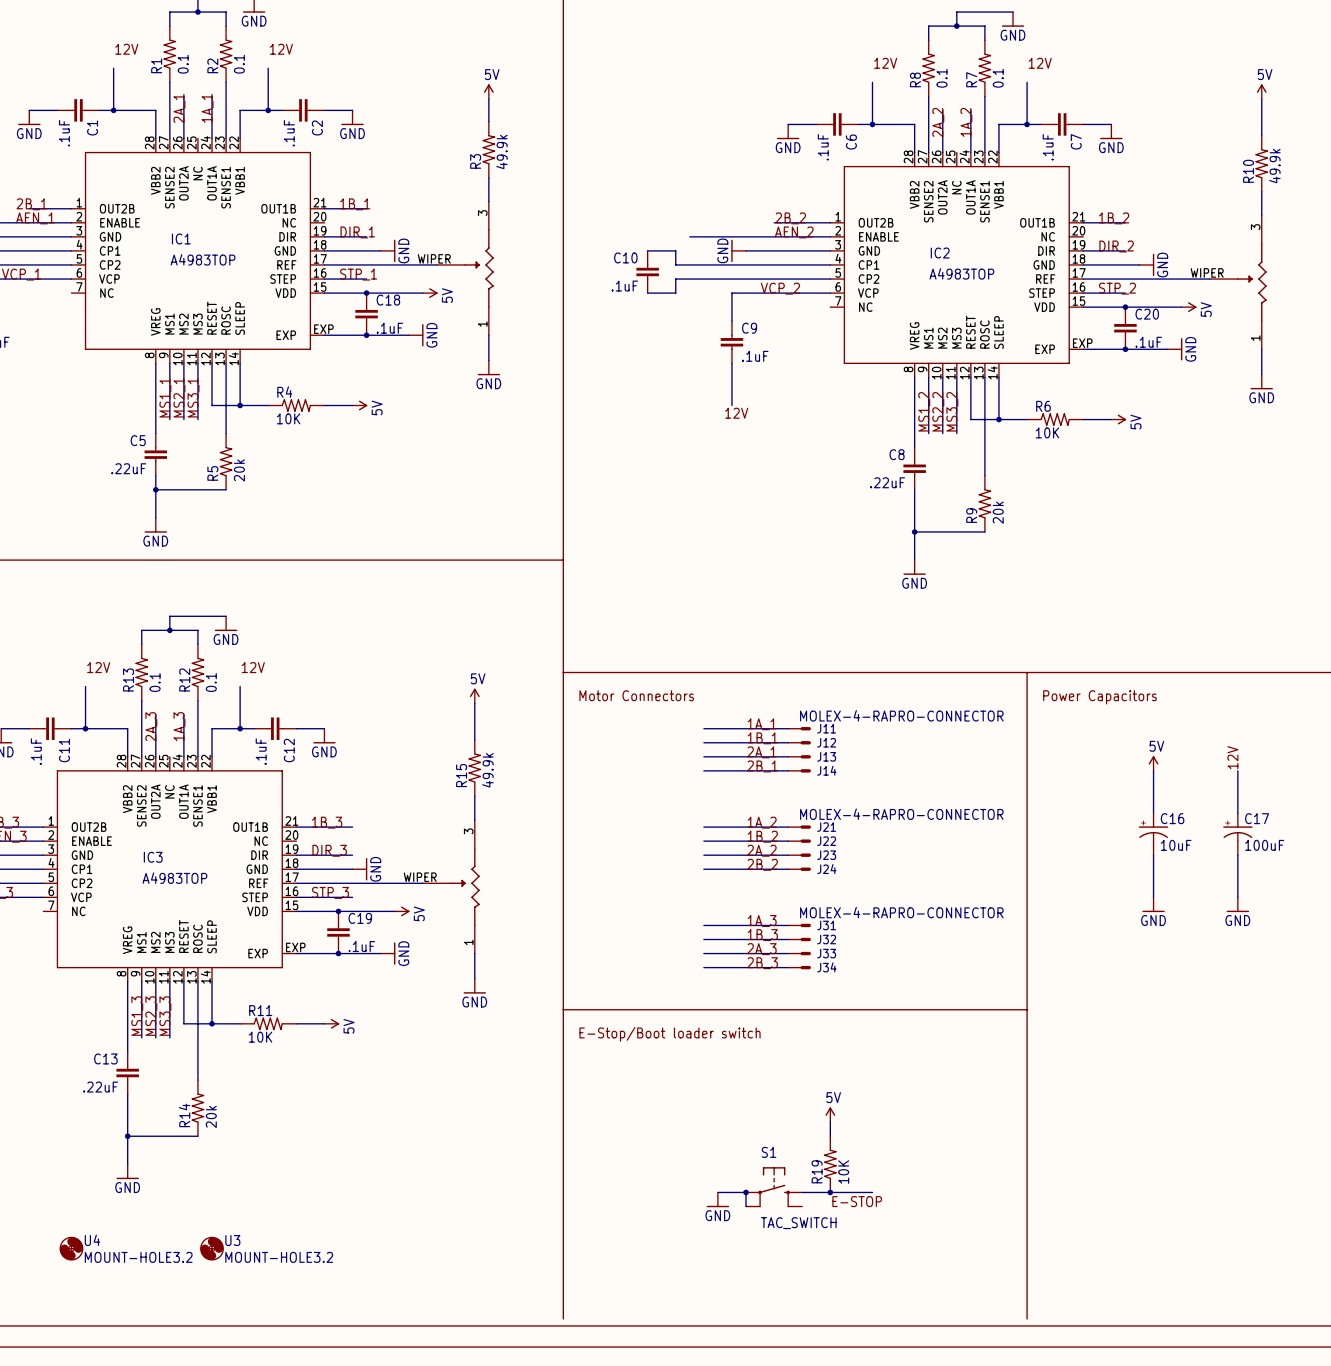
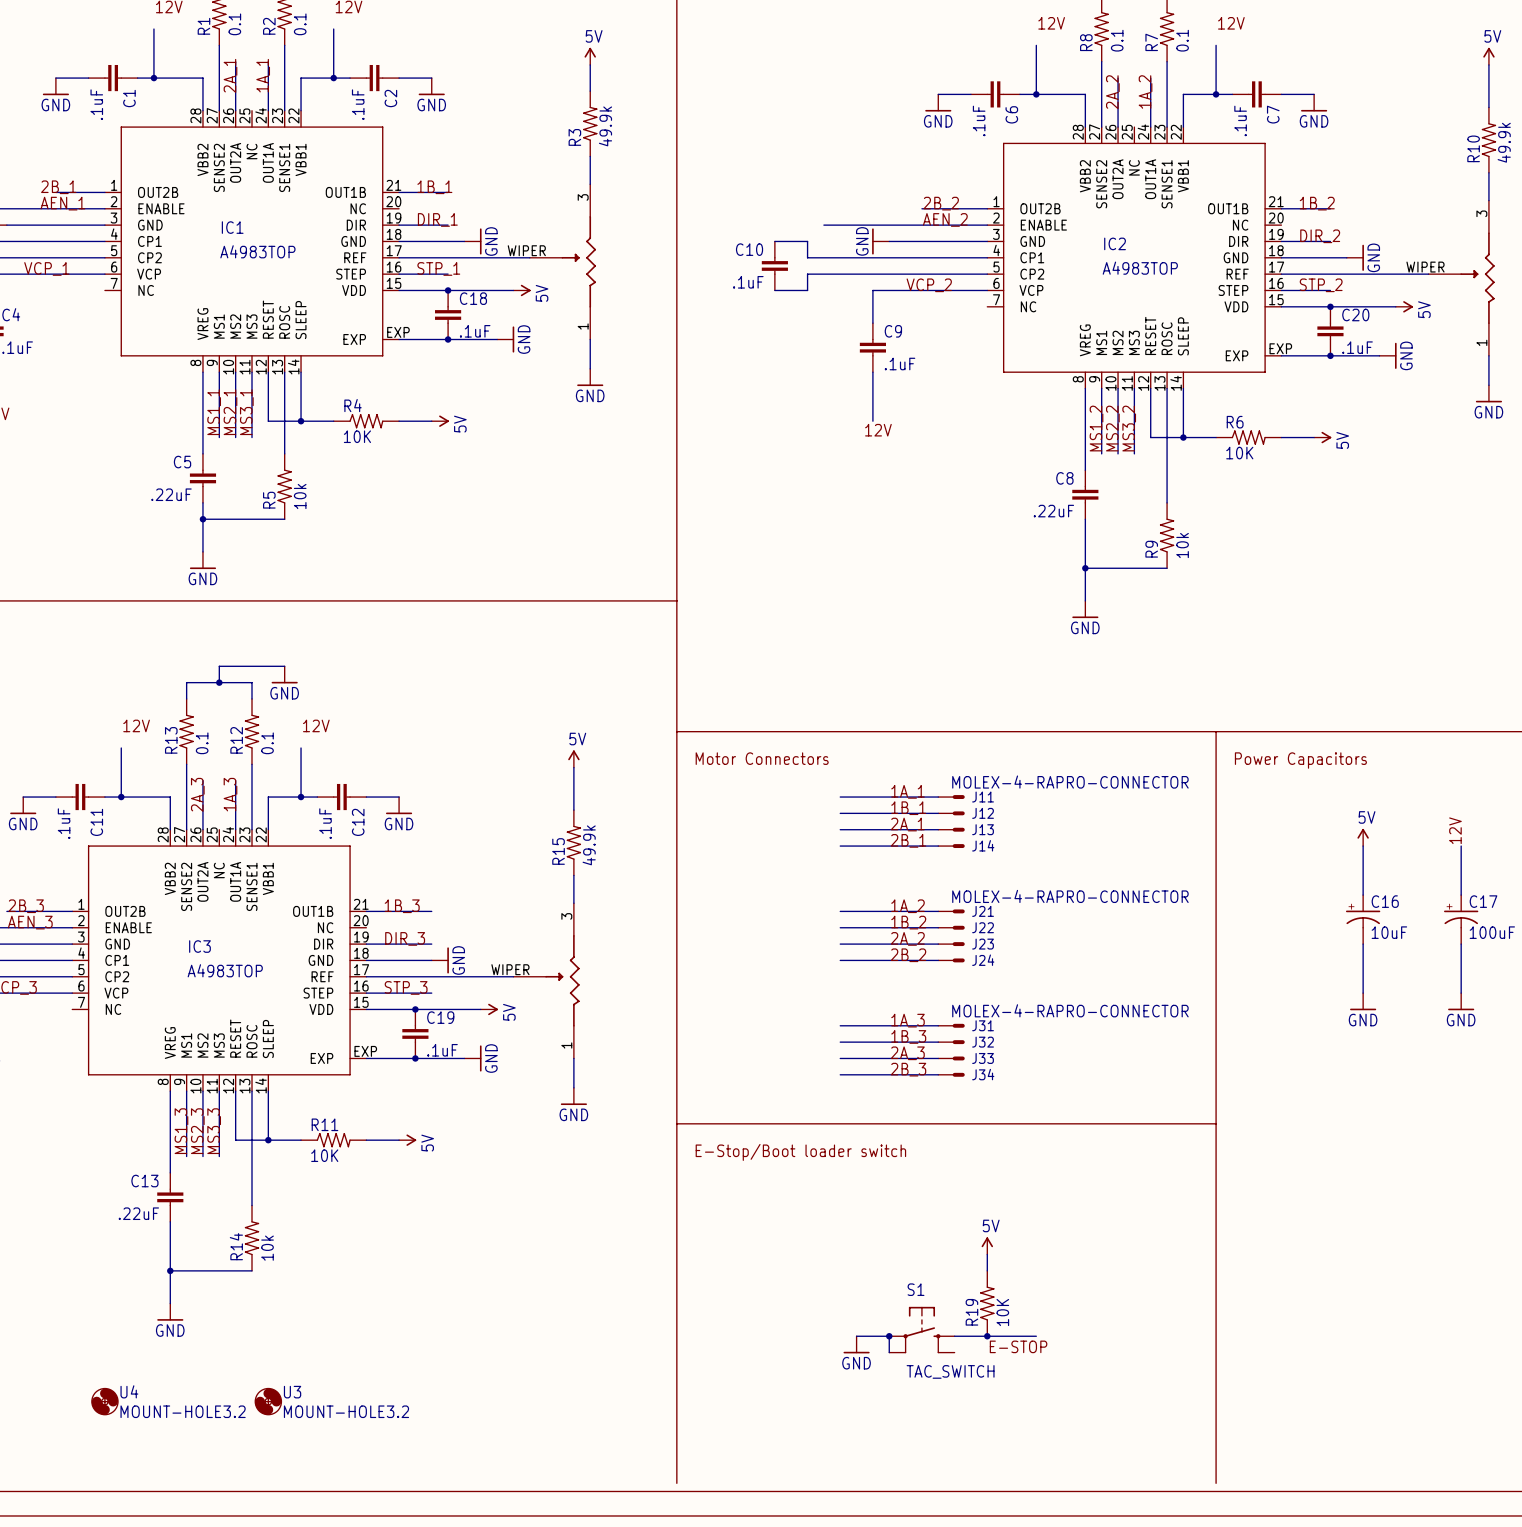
R5 value: 20k (239, 470) -> 10k (300, 496)
R9 value: 20k (998, 512) -> 10k (1182, 545)
R14 value: 20k (211, 1116) -> 10k (267, 1248)

